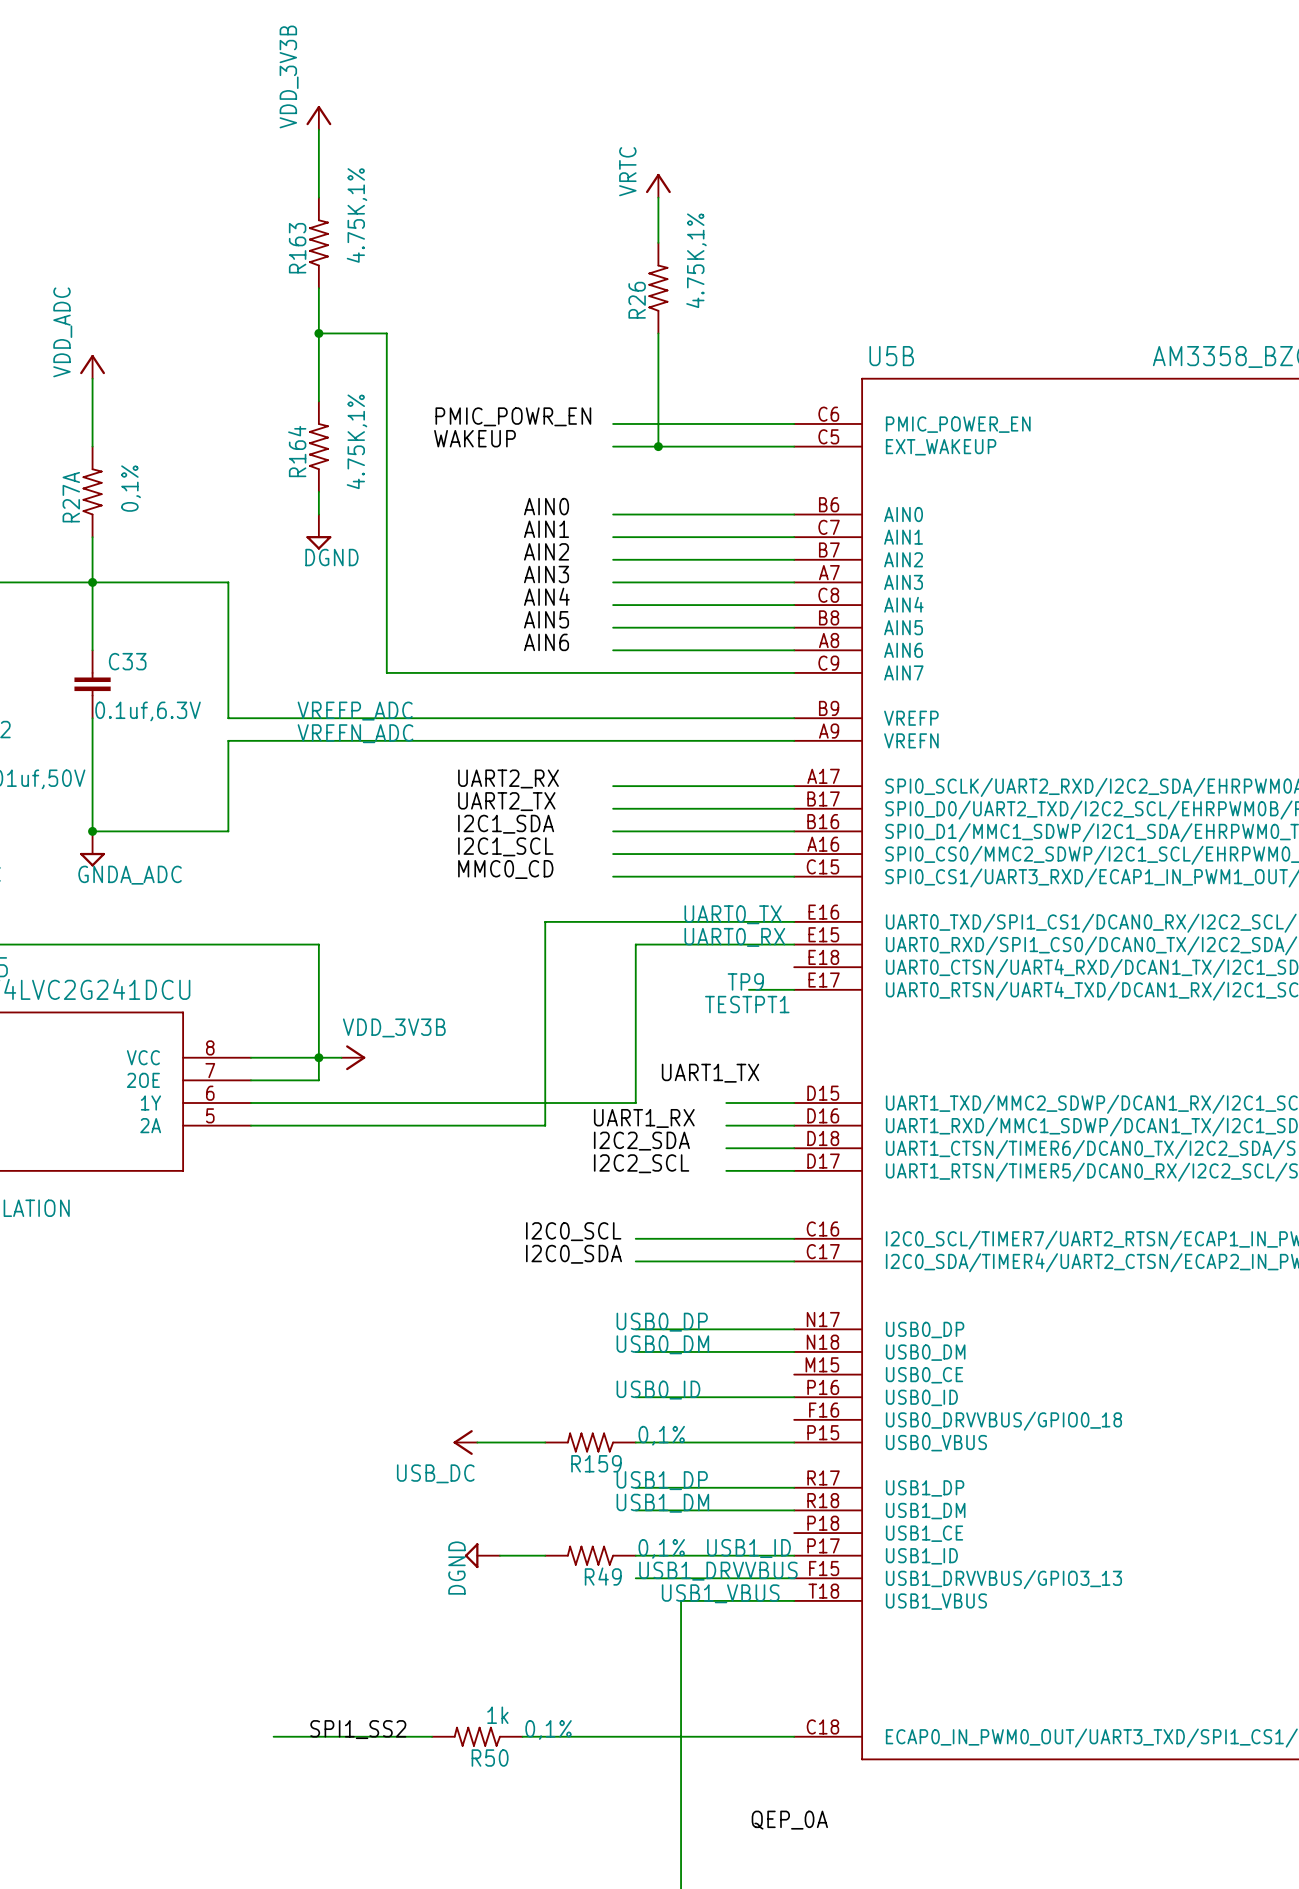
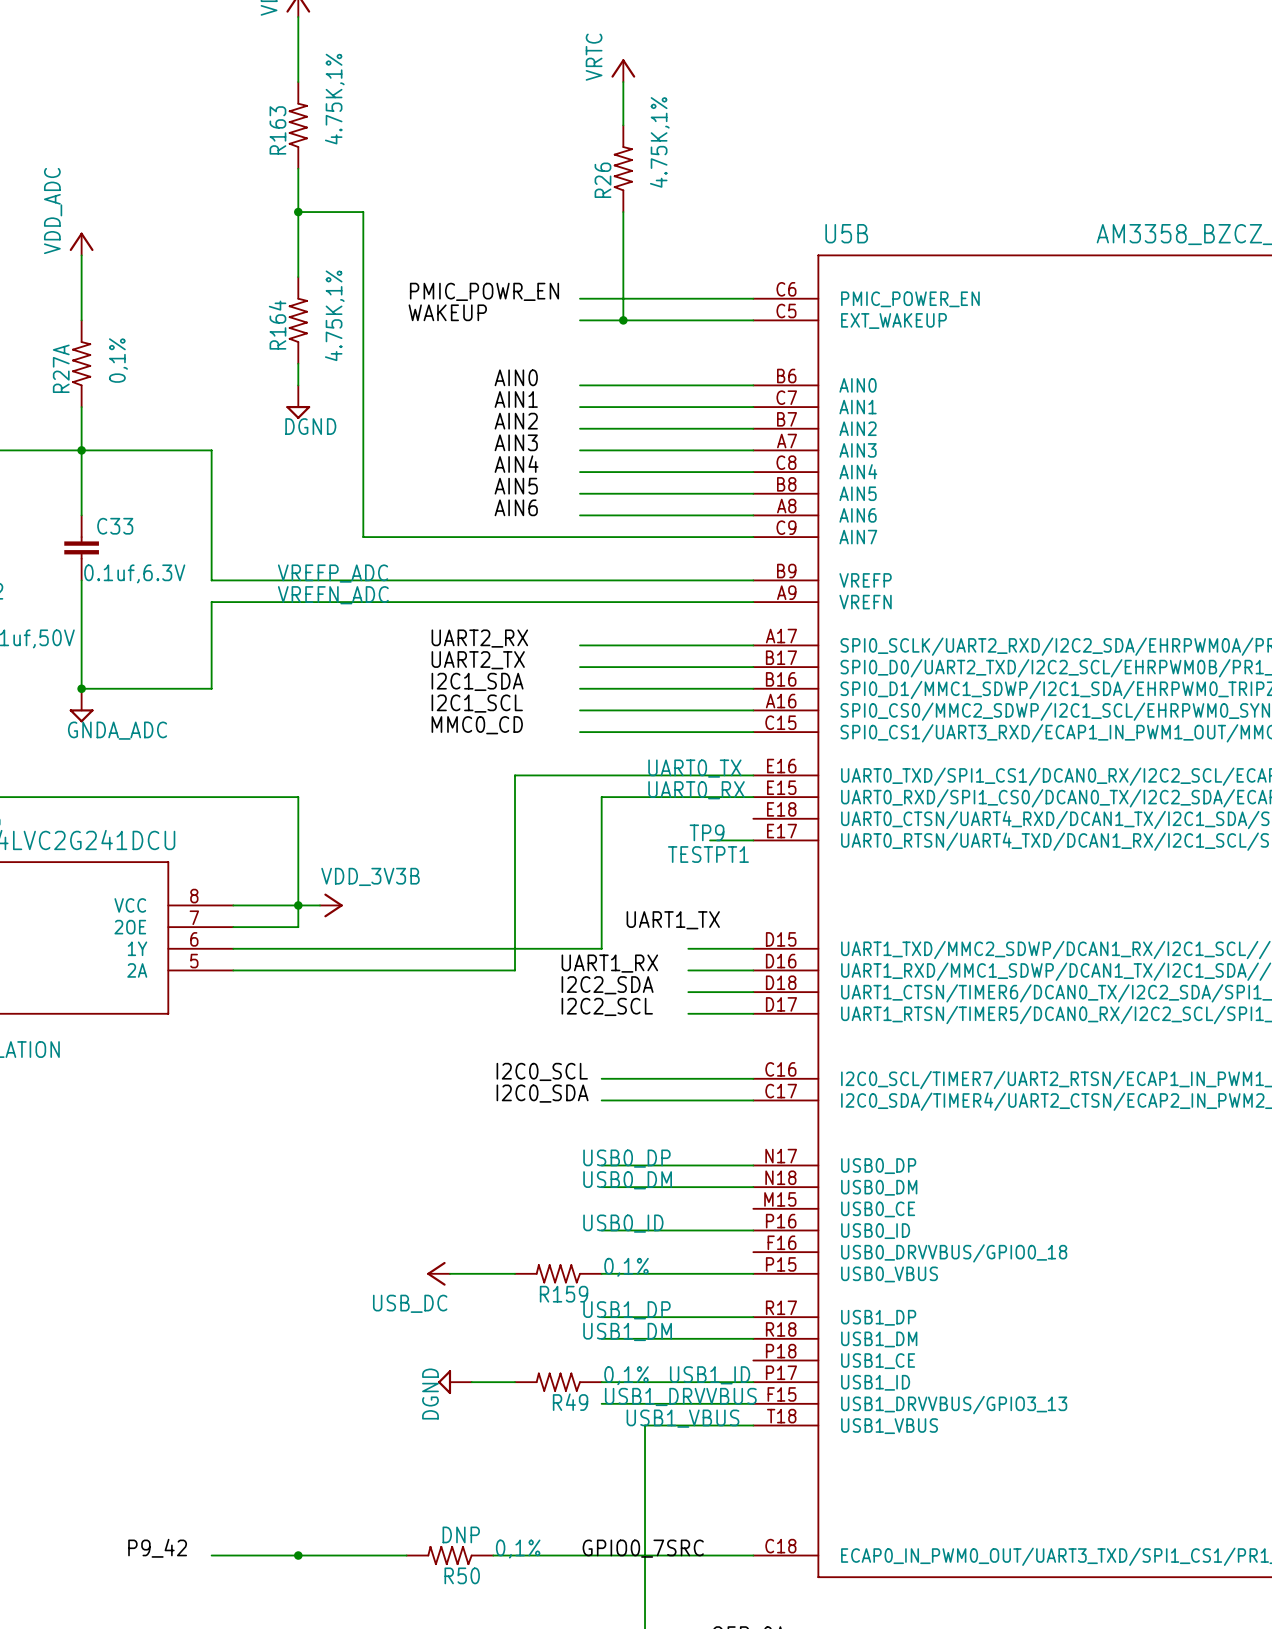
R50 value: 1k (497, 1715) -> DNP (461, 1534)
label: none -> P9_42 (157, 1548)
label: SPI1_SS2 (358, 1729) -> none
label: none -> GPIO0_7SRC (643, 1548)
wire: none -> (211, 1555) (254, 1555)
junction: none -> (298, 1555)

